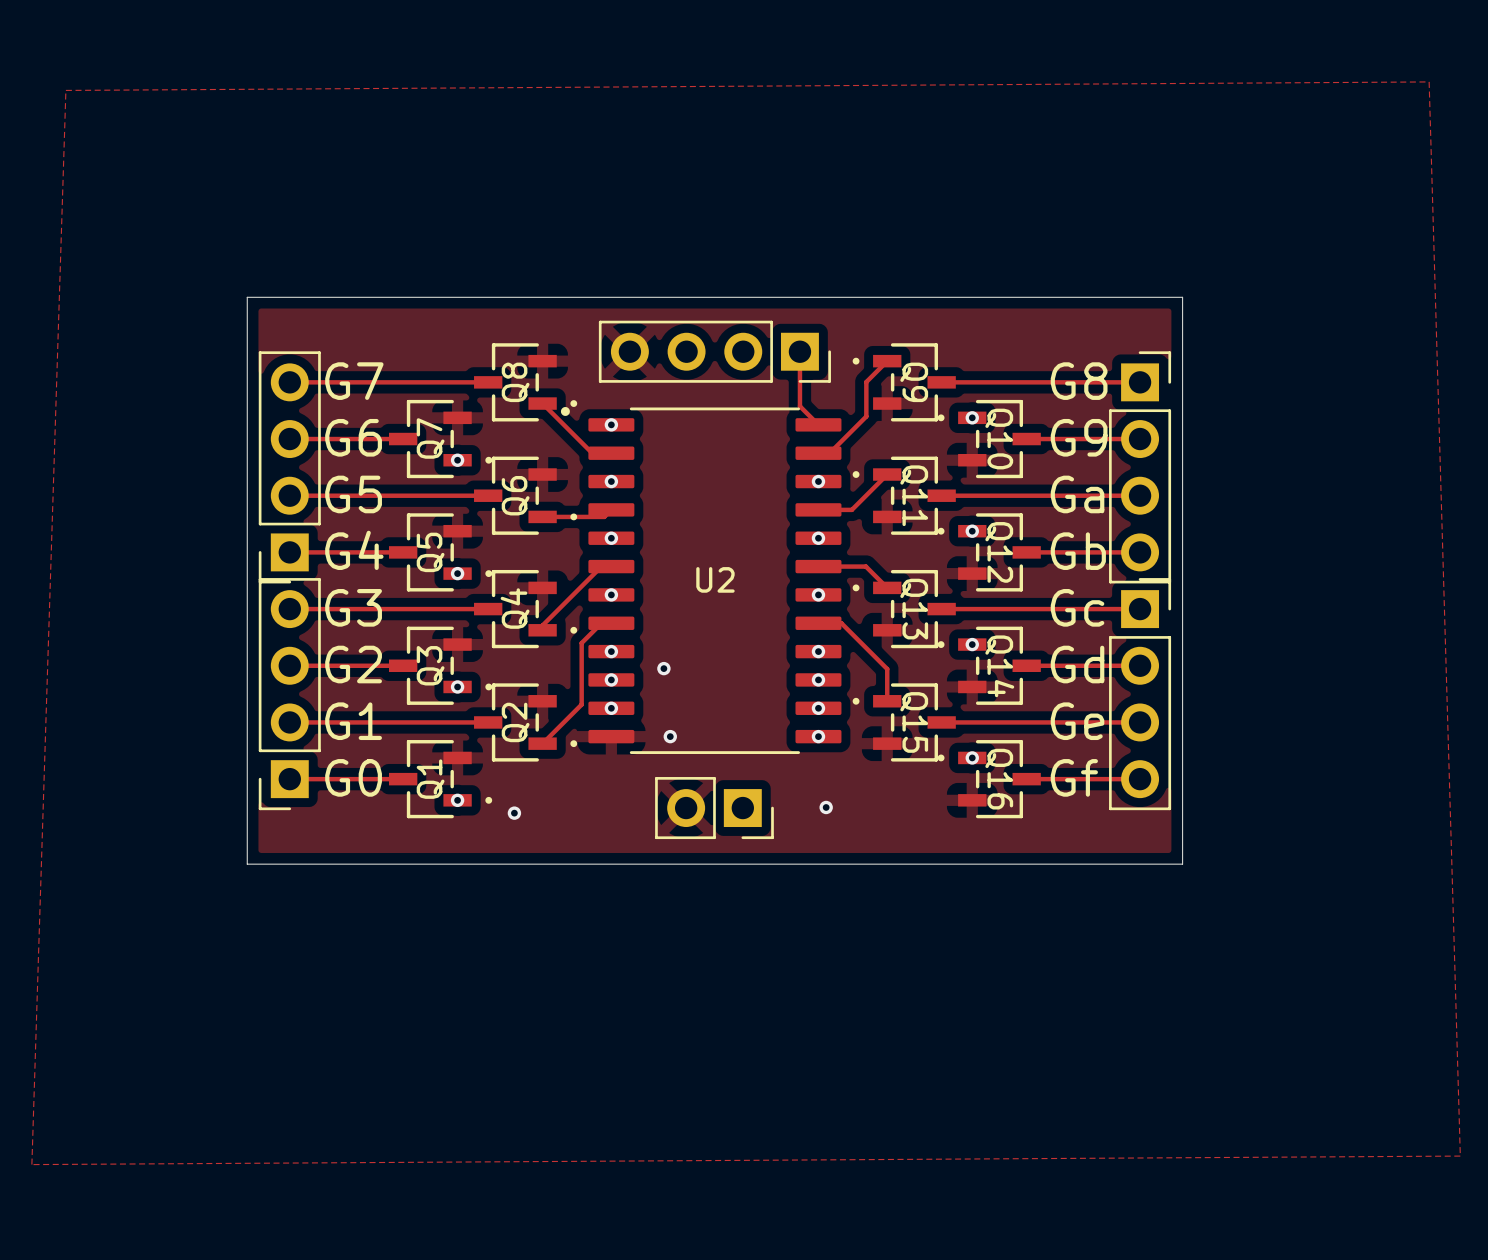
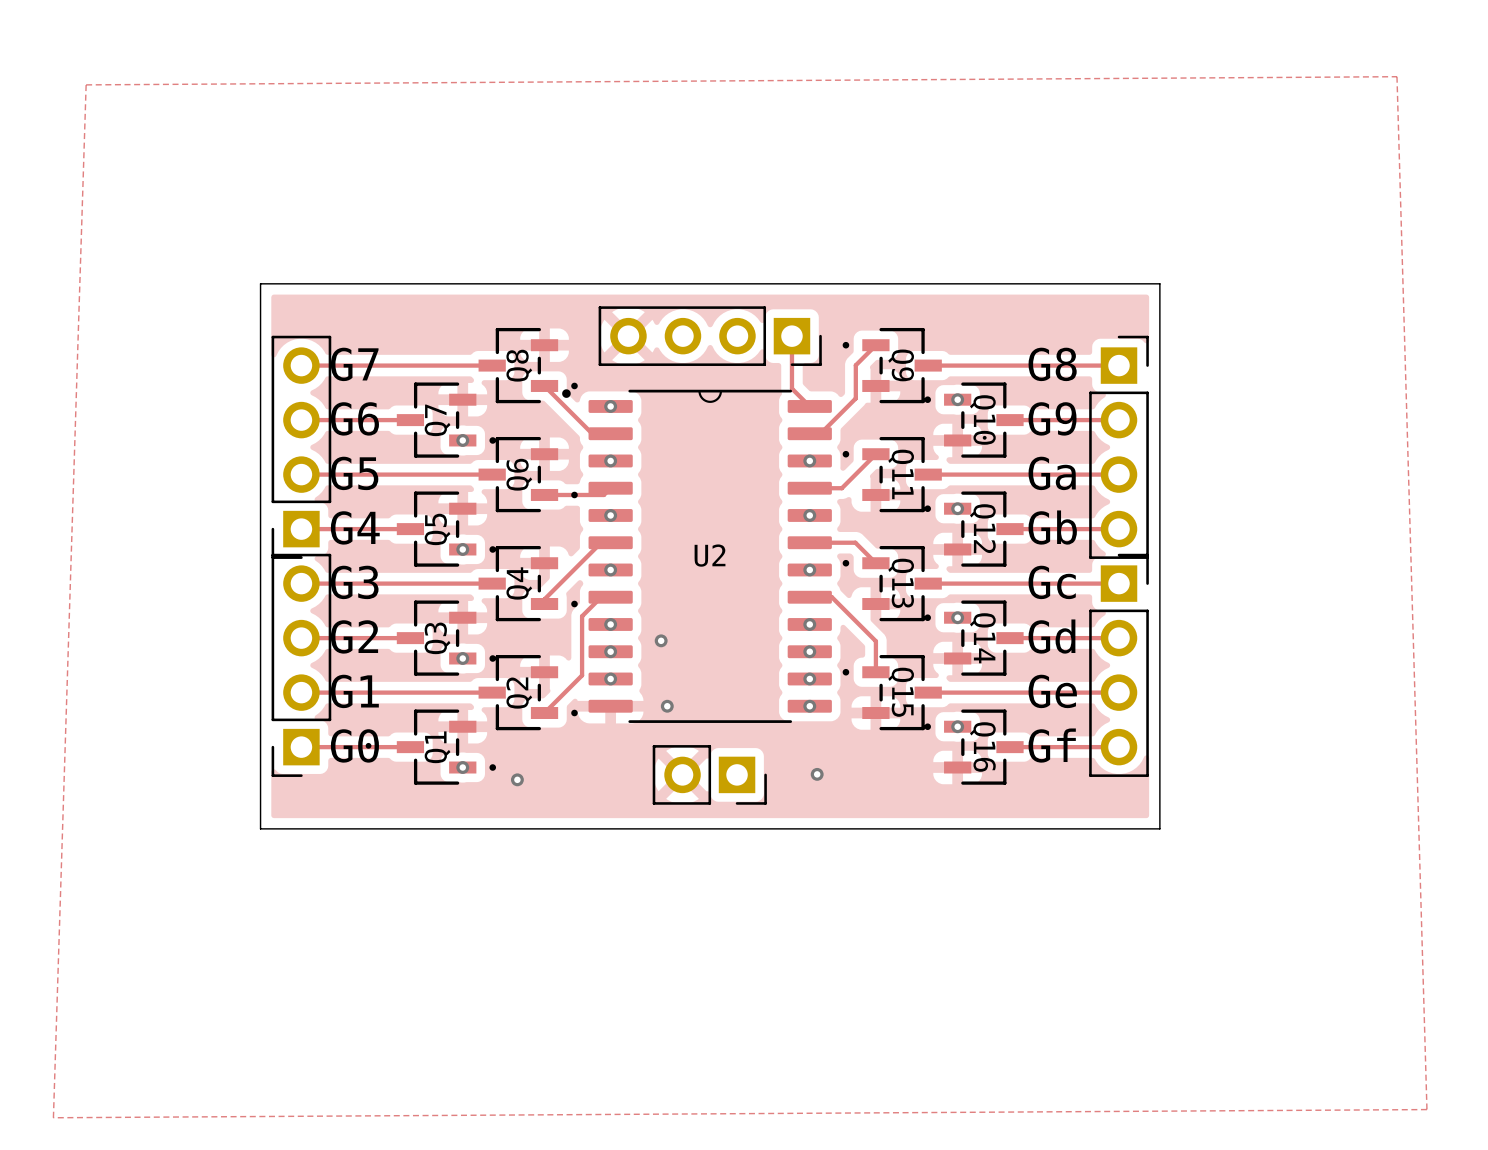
U2 footprint: [560, 407, 842, 755] -> [562, 389, 832, 723]

